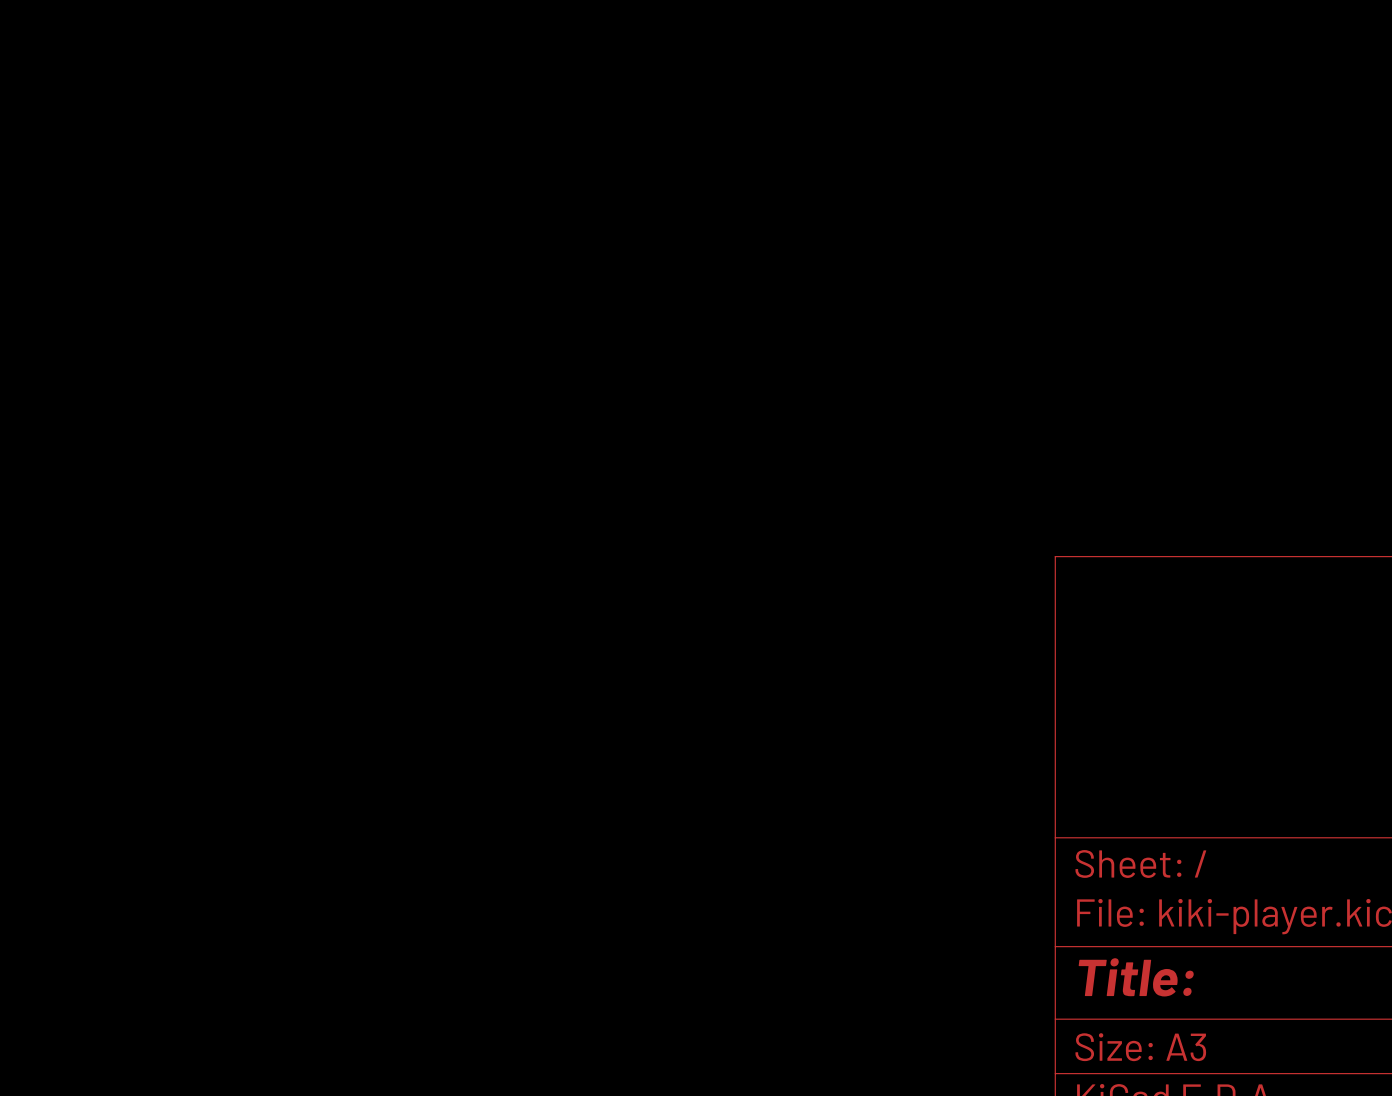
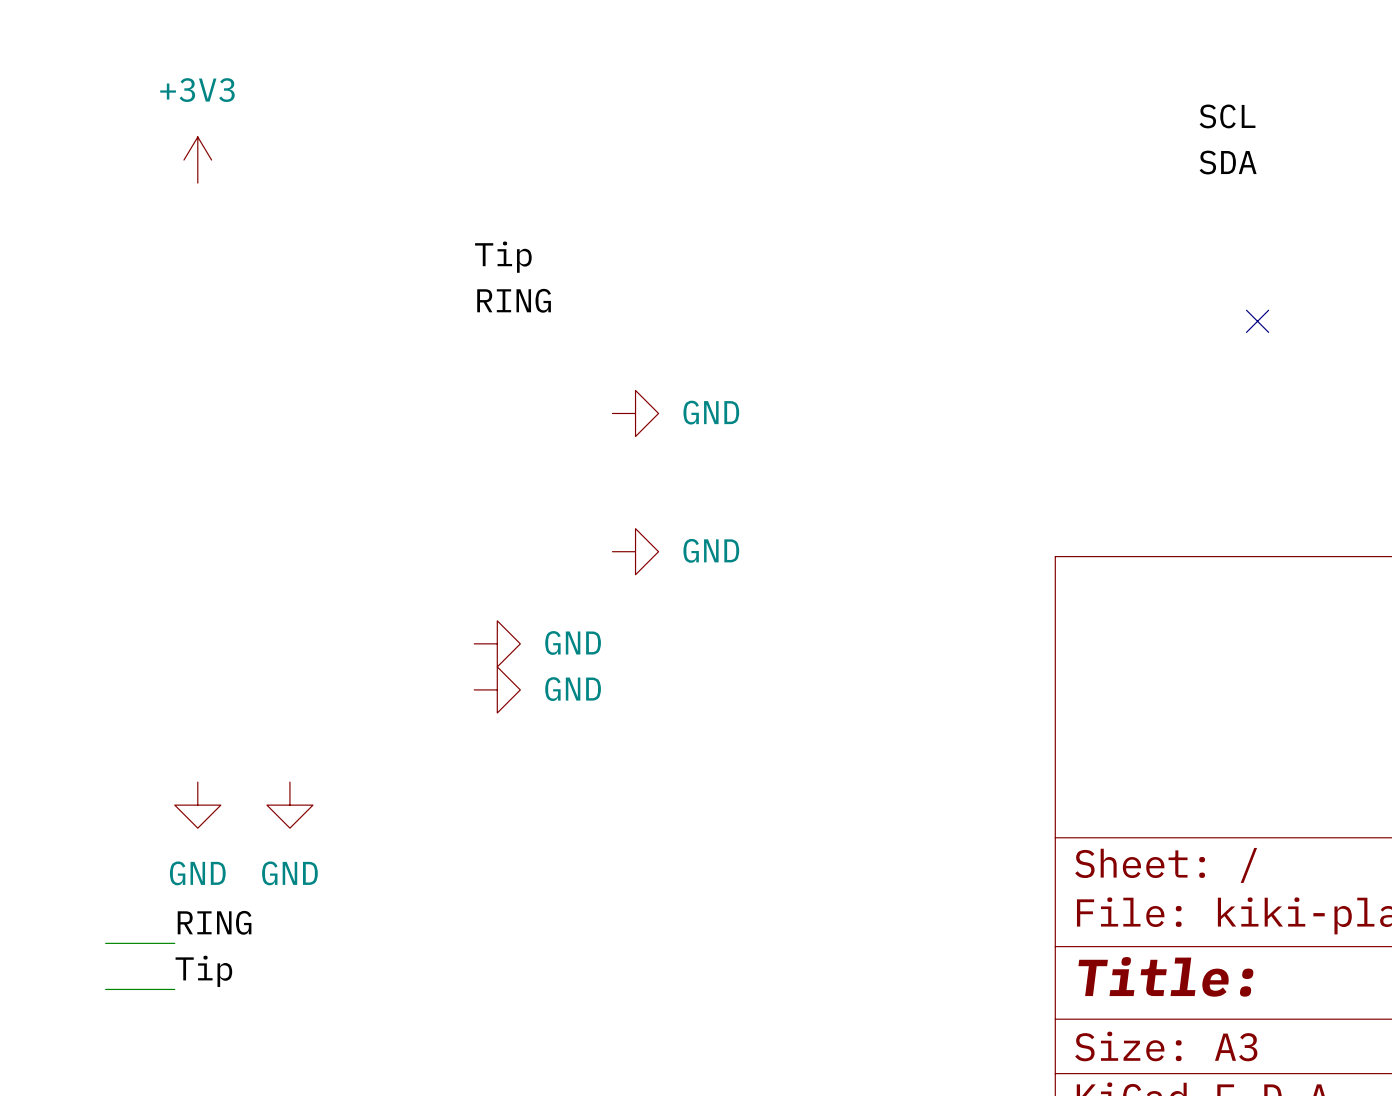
label: none -> SCL (1227, 116)
power symbol: none -> +3V3 (197, 160)
label: none -> SDA (1228, 162)
label: none -> Tip (503, 257)
label: none -> RING (514, 300)
no-connect mark: none -> (1257, 321)
power symbol: none -> GND (635, 413)
power symbol: none -> GND (635, 551)
power symbol: none -> GND (497, 643)
power symbol: none -> GND (497, 689)
power symbol: none -> GND (197, 805)
power symbol: none -> GND (289, 805)
label: none -> RING (214, 922)
wire: none -> (105, 943) (174, 943)
label: none -> Tip (203, 971)
wire: none -> (105, 989) (174, 989)

